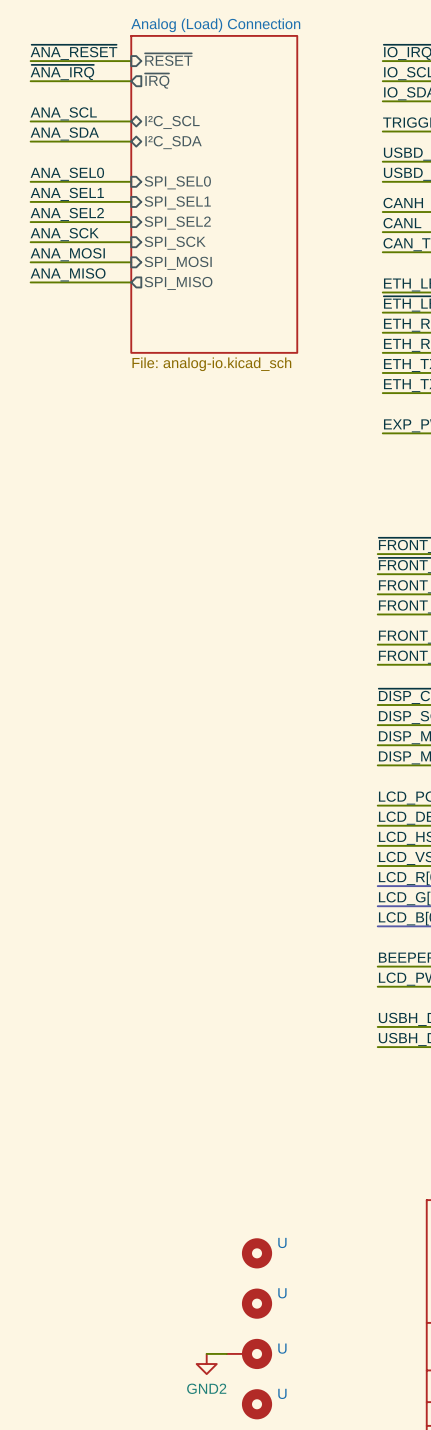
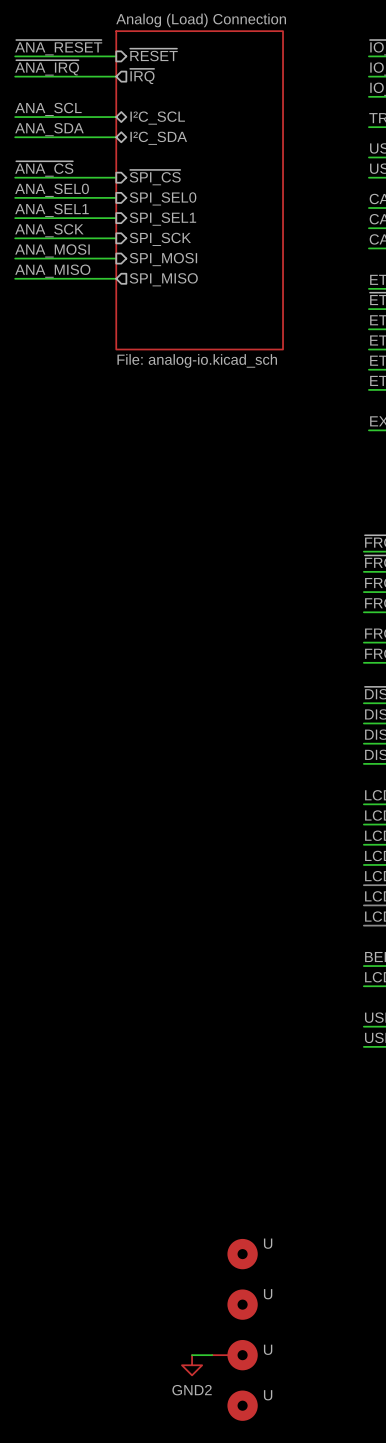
label: ANA_SEL0 (67, 174) -> ~{ANA_CS} (44, 168)
sheet pin: SPI_SEL0 (177, 182) -> ~{SPI_CS} (155, 177)
label: ANA_SEL1 (67, 194) -> ANA_SEL0 (52, 190)
sheet pin: SPI_SEL1 (177, 202) -> SPI_SEL0 (163, 198)
label: ANA_SEL2 (67, 214) -> ANA_SEL1 (51, 210)
sheet pin: SPI_SEL2 (177, 223) -> SPI_SEL1 (162, 219)

